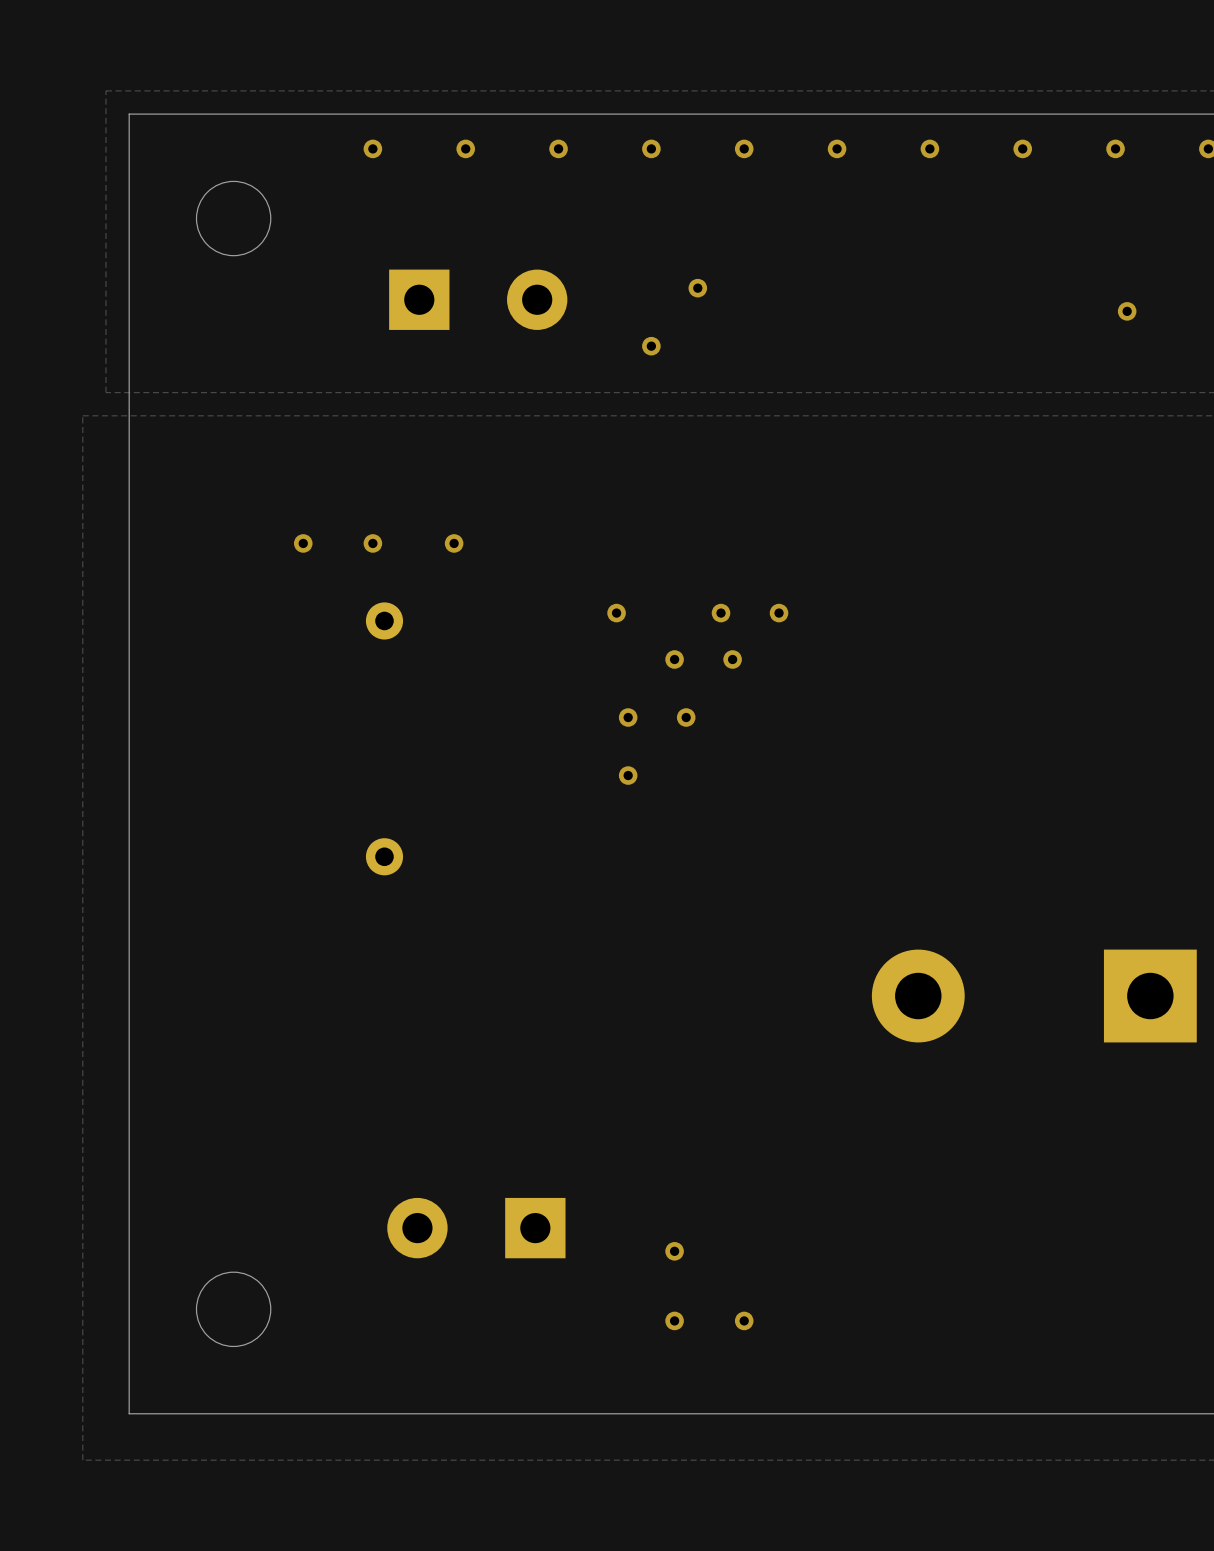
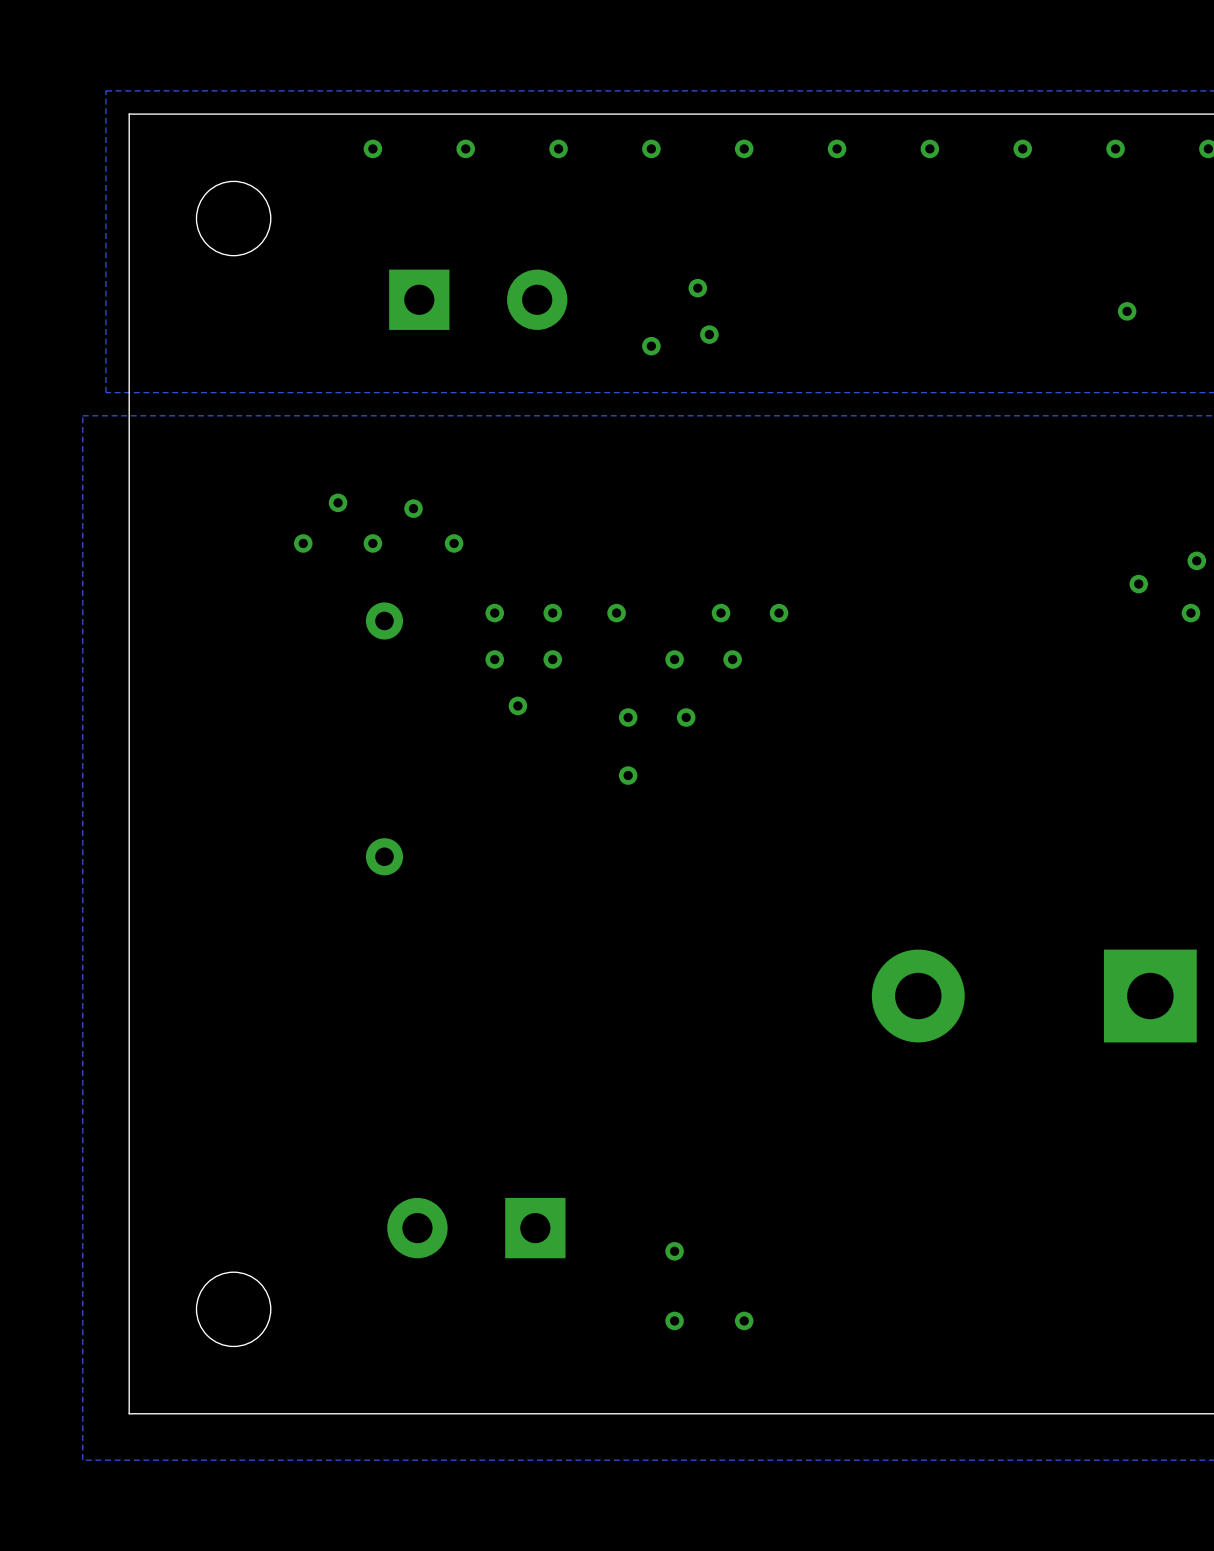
via: none -> (709, 334)
via: none -> (338, 502)
via: none -> (413, 508)
via: none -> (1196, 560)
via: none -> (1138, 584)
via: none -> (494, 613)
via: none -> (552, 613)
via: none -> (1190, 613)
via: none -> (494, 659)
via: none -> (552, 659)
via: none -> (517, 705)

